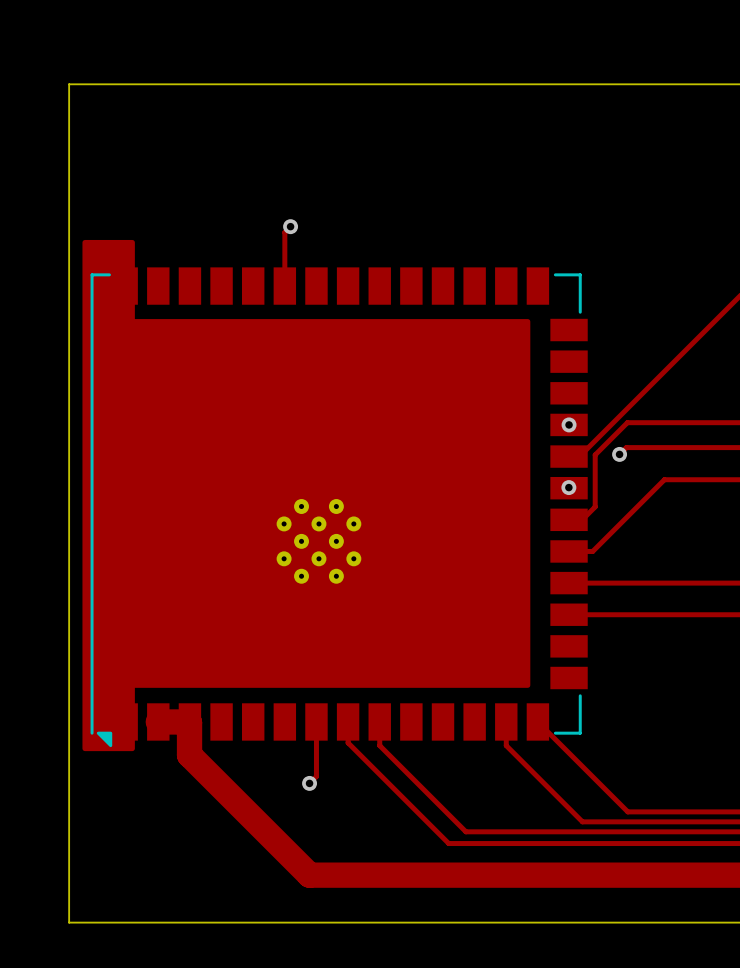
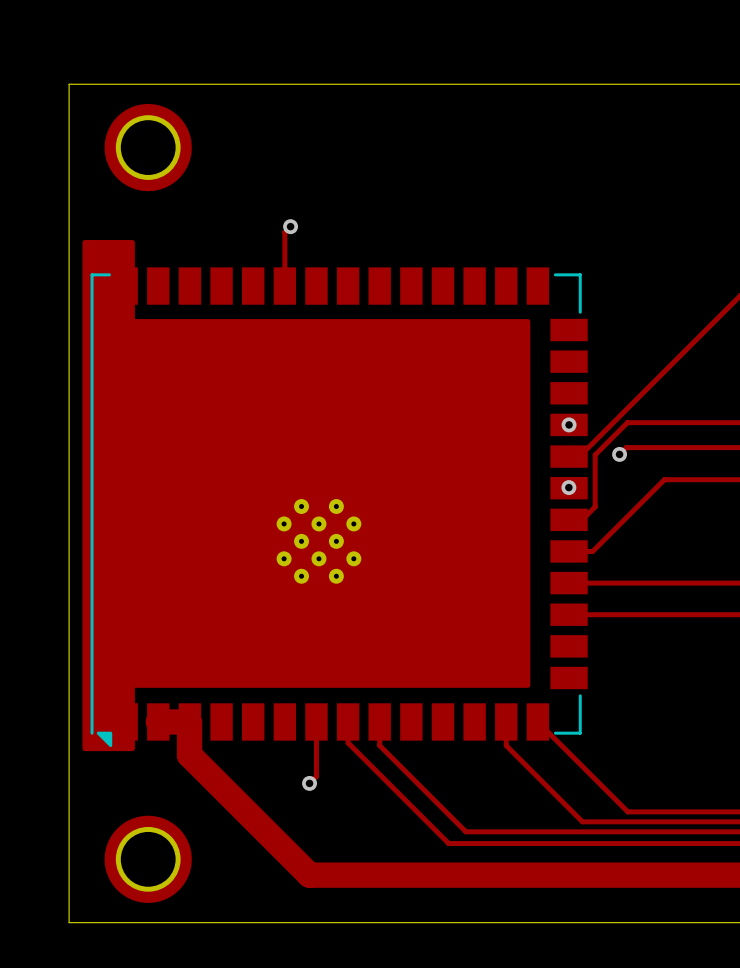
part: none -> (148, 147)
part: none -> (148, 859)

